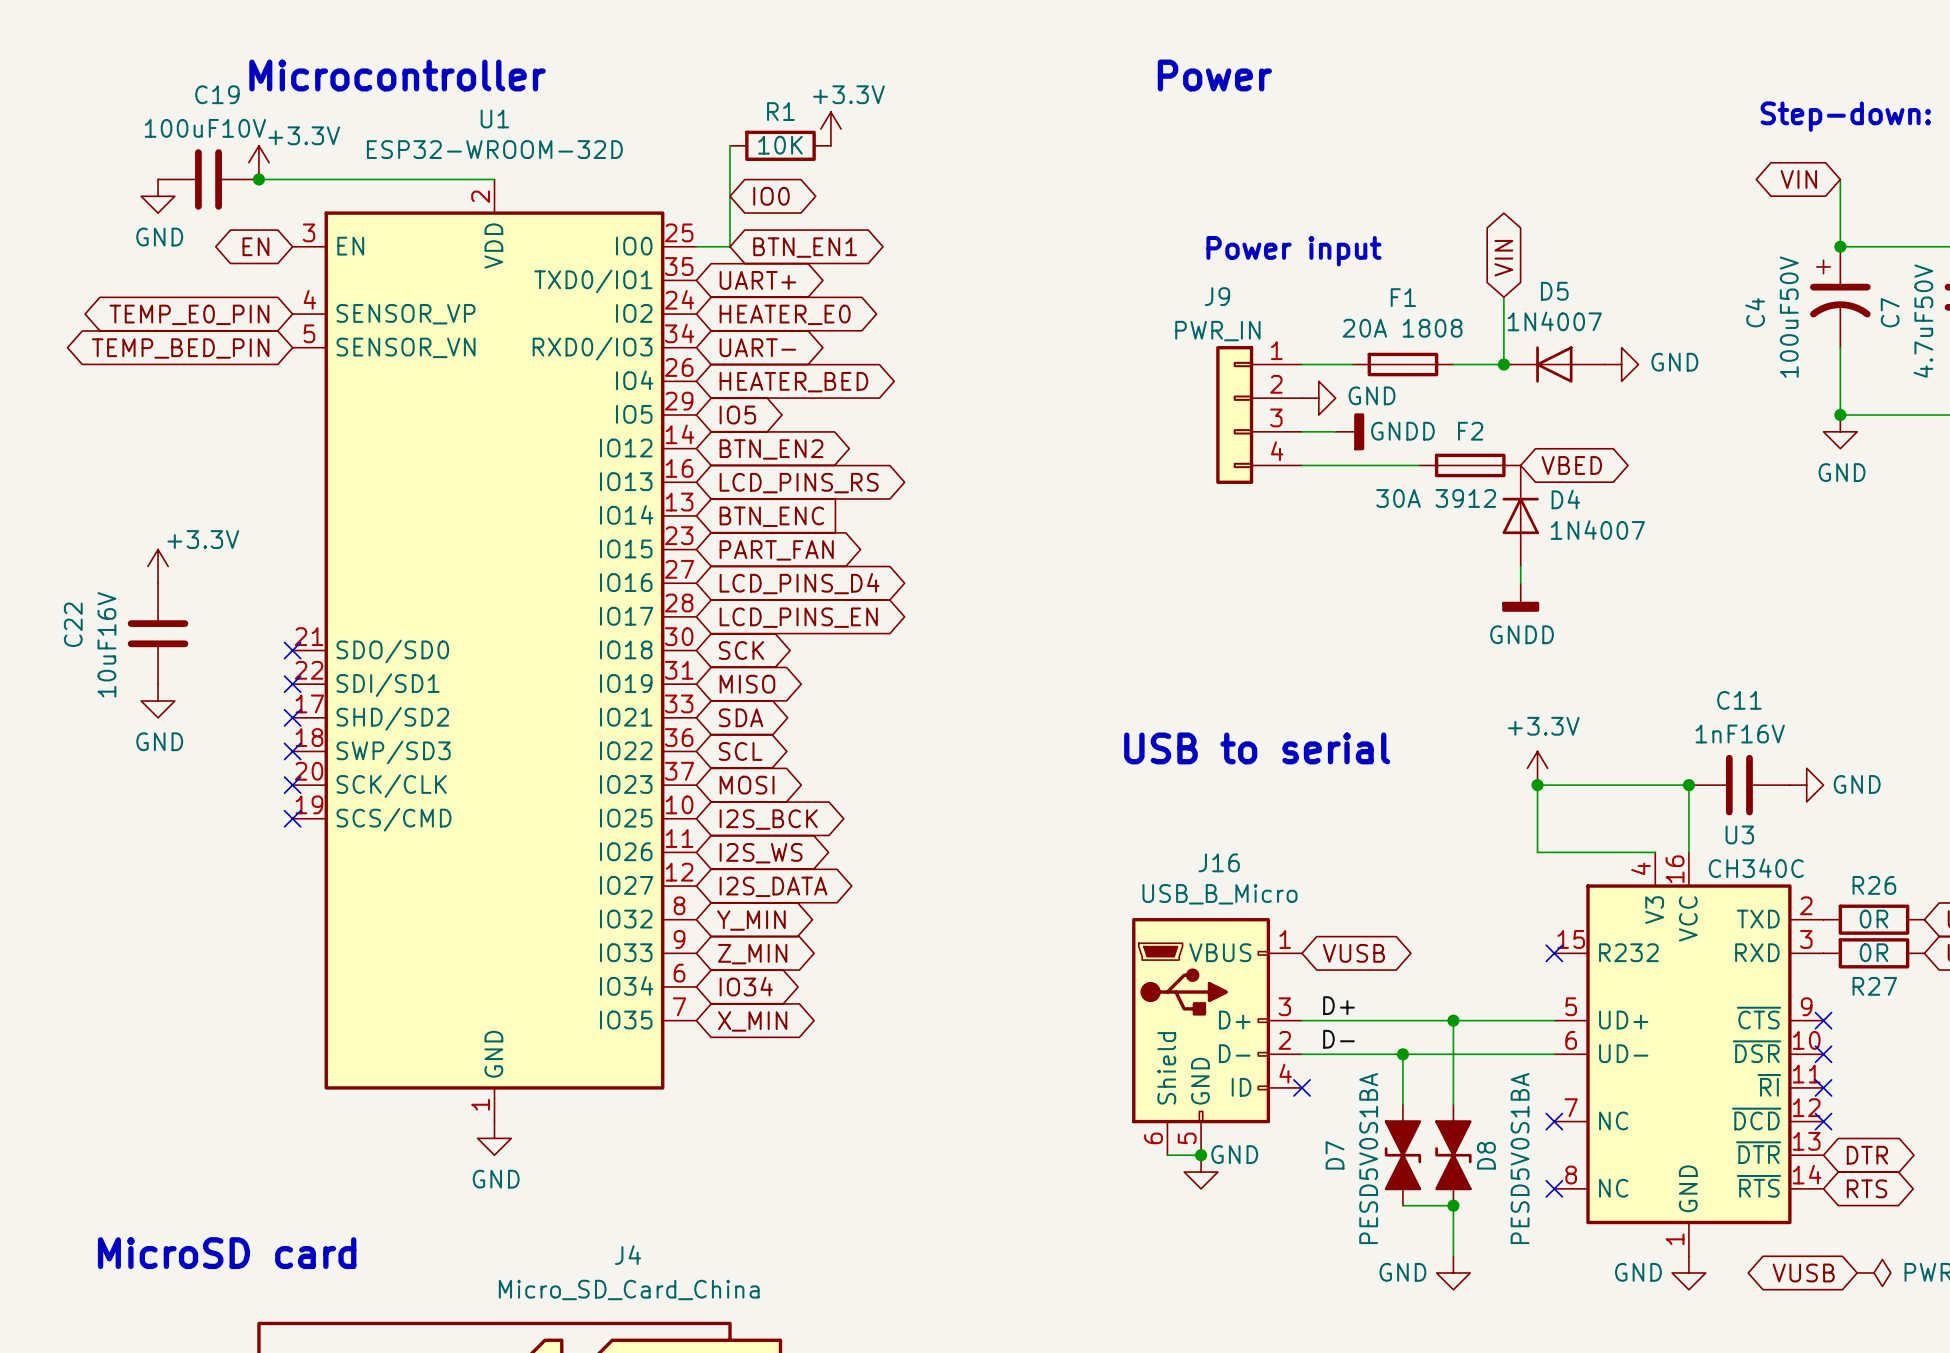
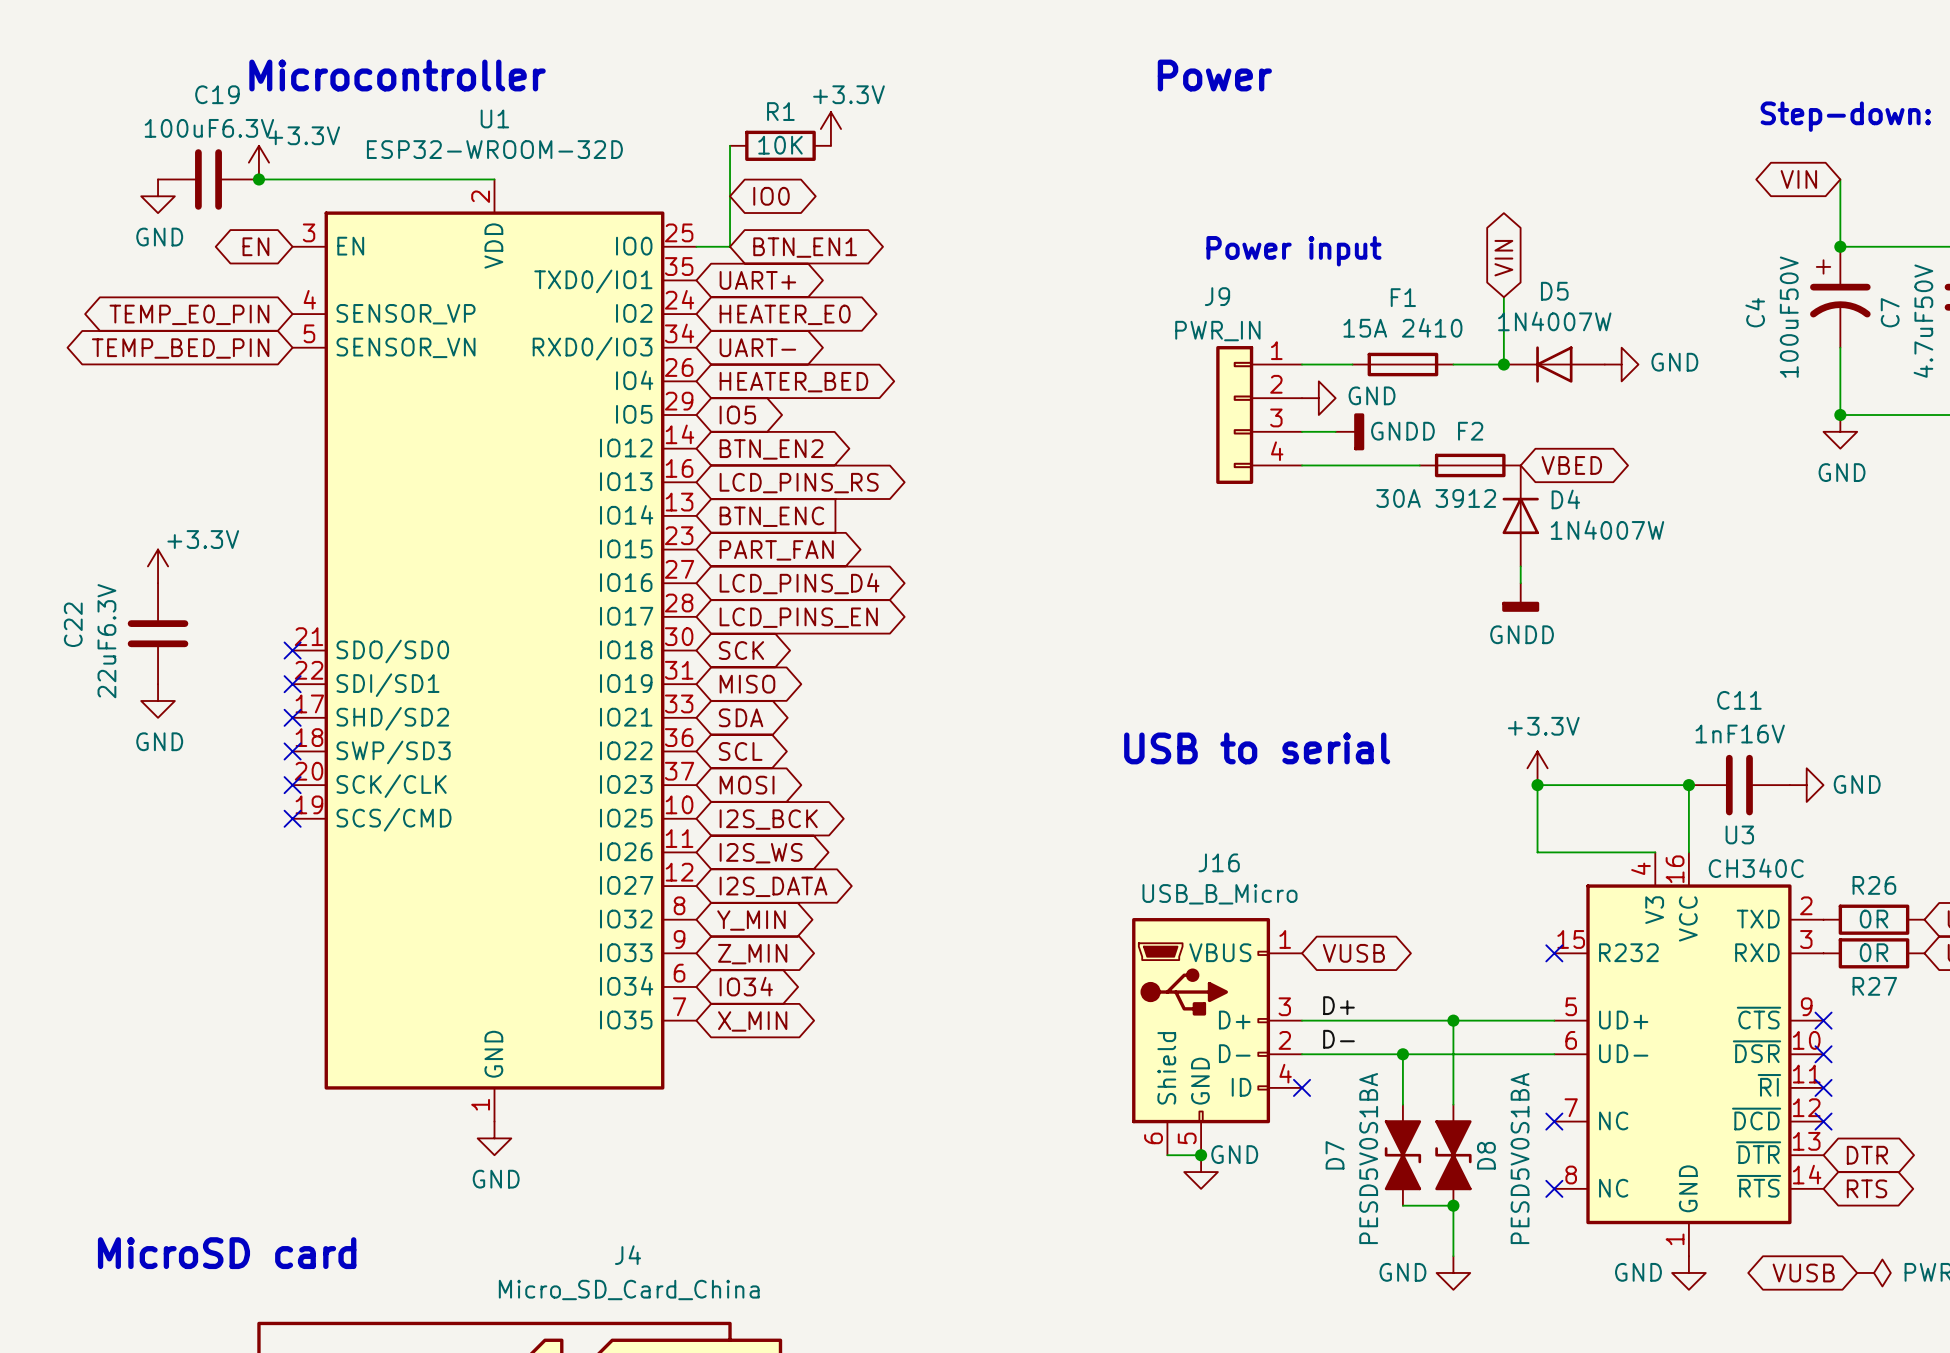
C19 value: 100uF10V (205, 128) -> 100uF6.3V (209, 128)
D5 value: 1N4007 (1554, 321) -> 1N4007W (1554, 321)
F1 value: 20A 1808 (1402, 328) -> 15A 2410 (1402, 327)
D4 value: 1N4007 (1597, 530) -> 1N4007W (1607, 530)
C22 value: 10uF16V (106, 644) -> 22uF6.3V (106, 641)

